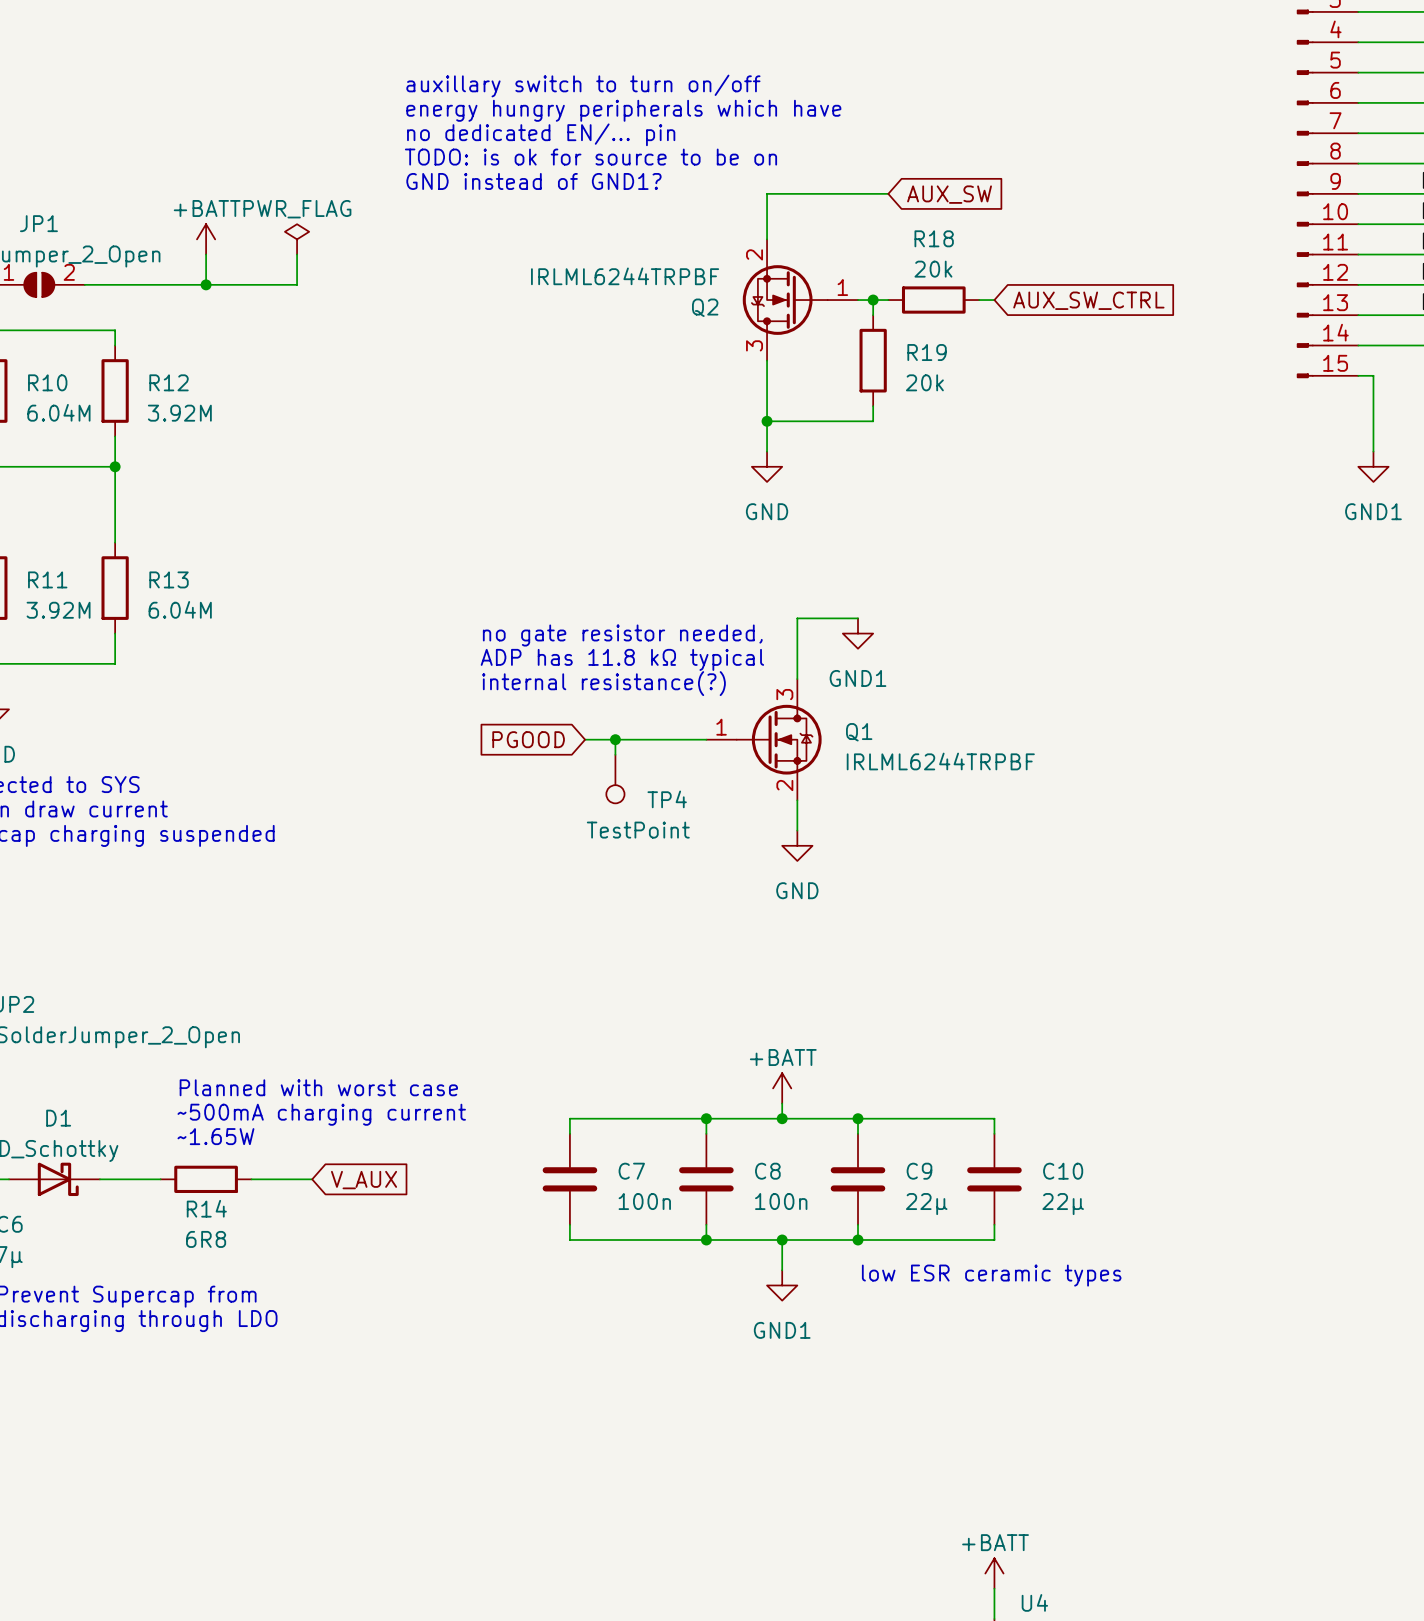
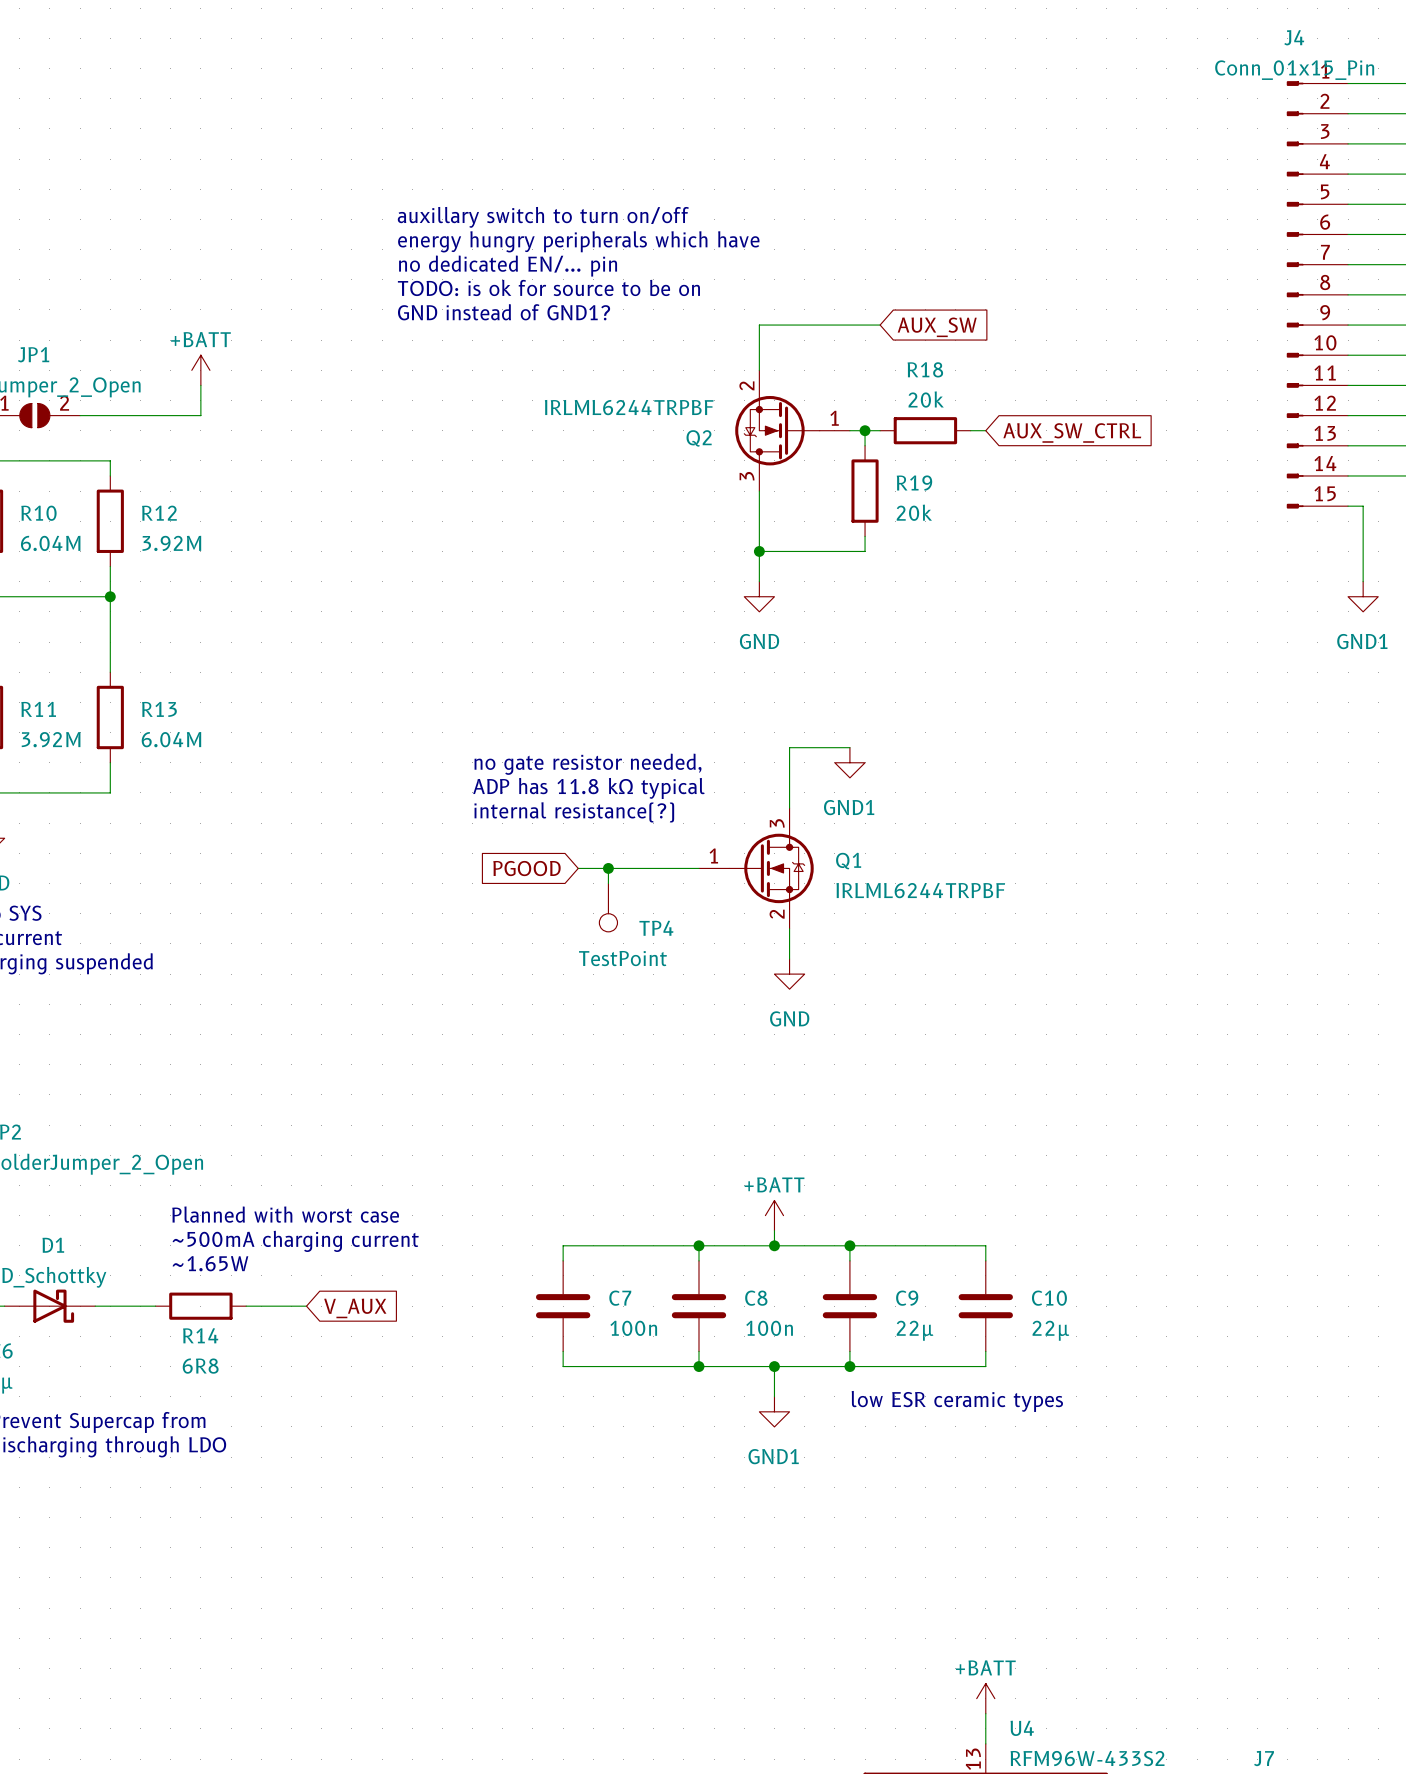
power symbol: PWR_FLAG (297, 239) -> none
wire: (297, 254) (297, 284) (206, 284) -> none
junction: (206, 284) -> none

